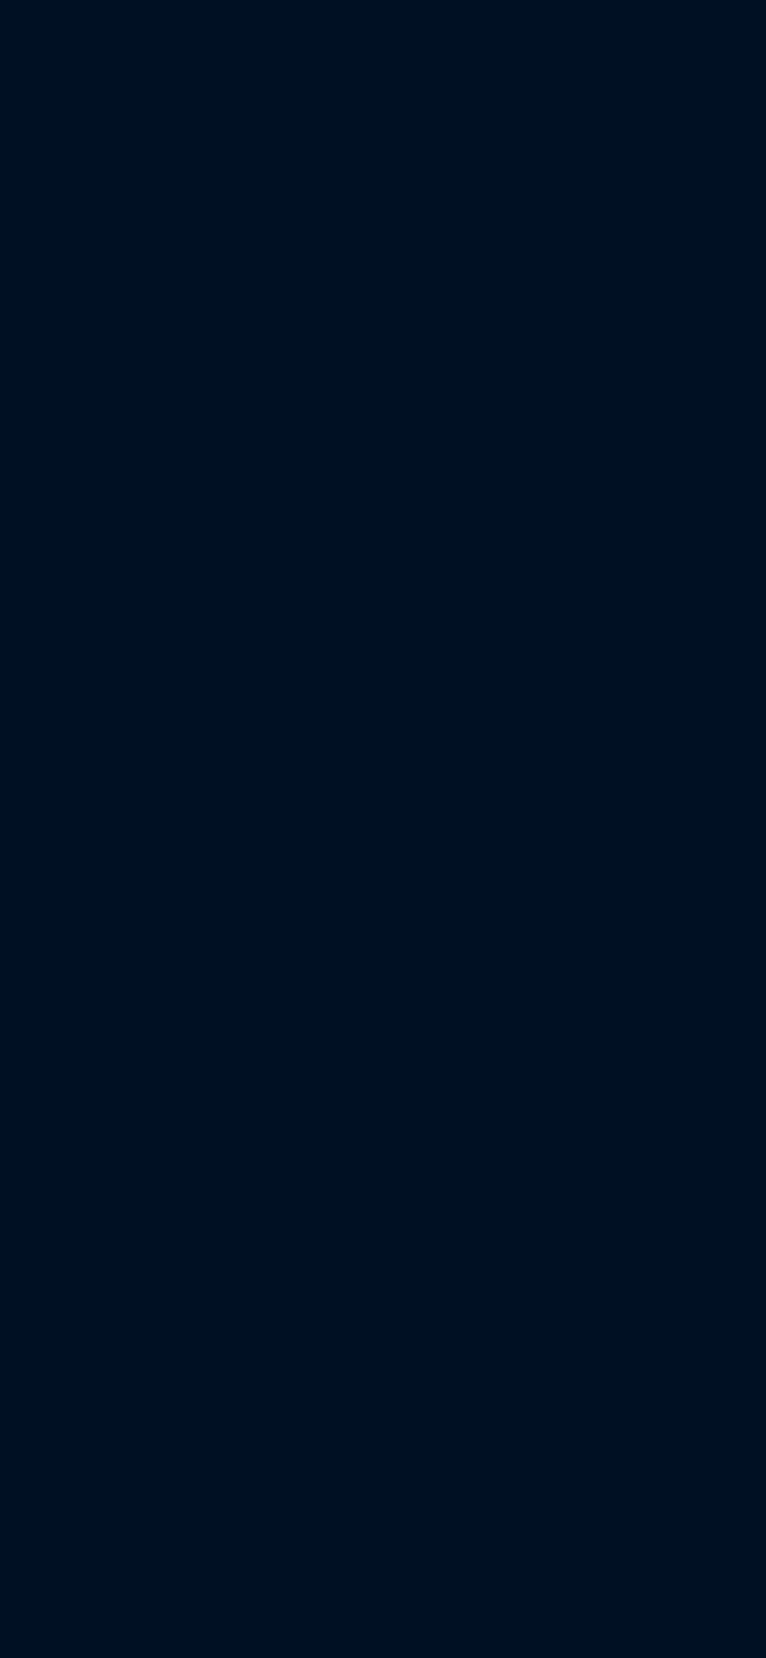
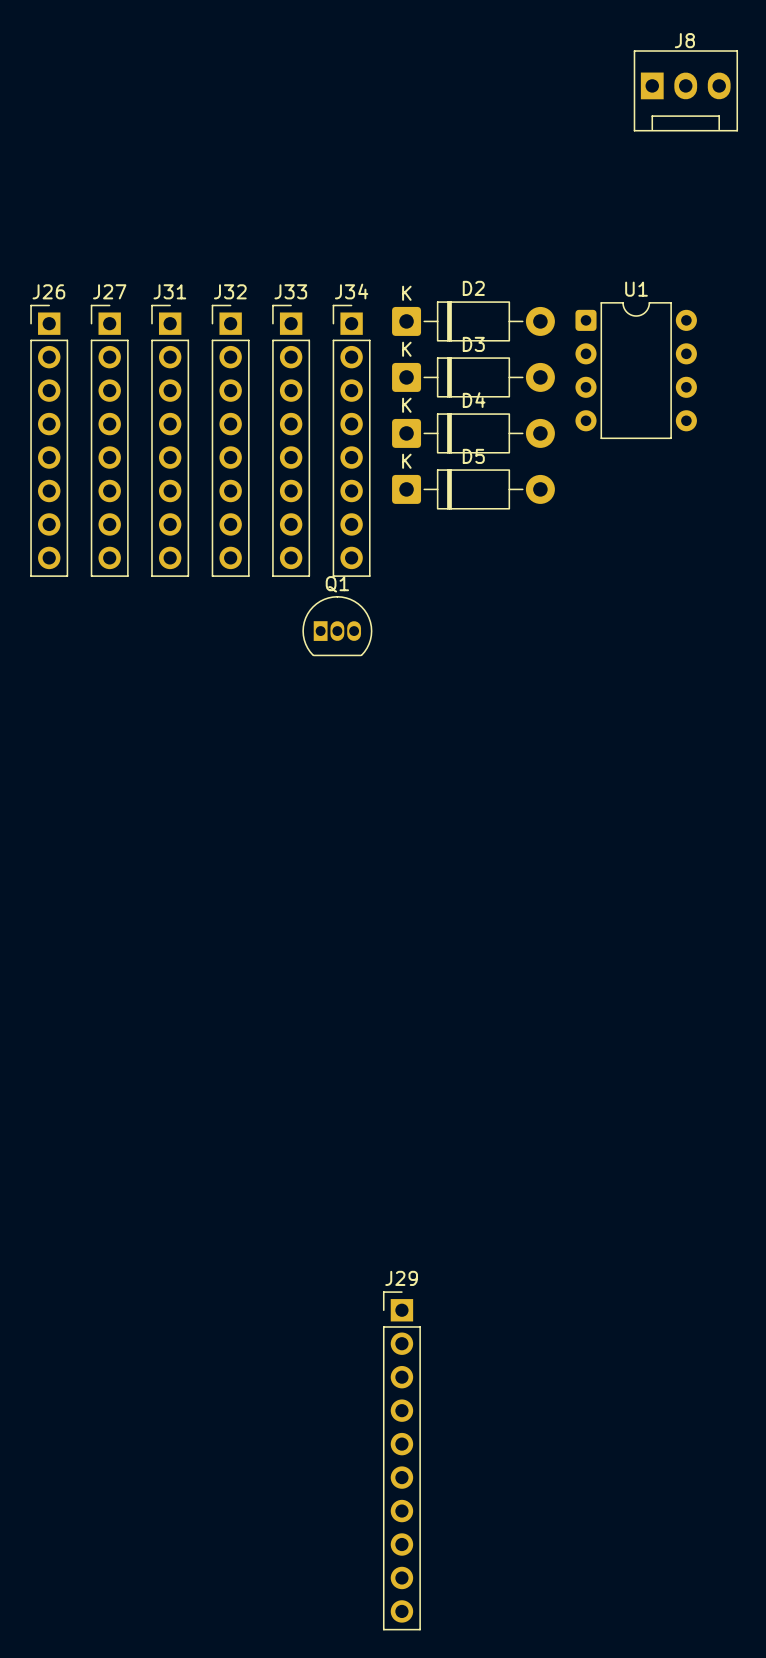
J8: none -> (685, 90)
D2: none -> (473, 321)
U1: none -> (636, 370)
D3: none -> (473, 377)
D4: none -> (473, 433)
J26: none -> (49, 440)
J27: none -> (109, 440)
J31: none -> (170, 440)
J32: none -> (230, 440)
J33: none -> (291, 440)
J34: none -> (351, 440)
D5: none -> (473, 489)
Q1: none -> (337, 626)
J29: none -> (401, 1460)

